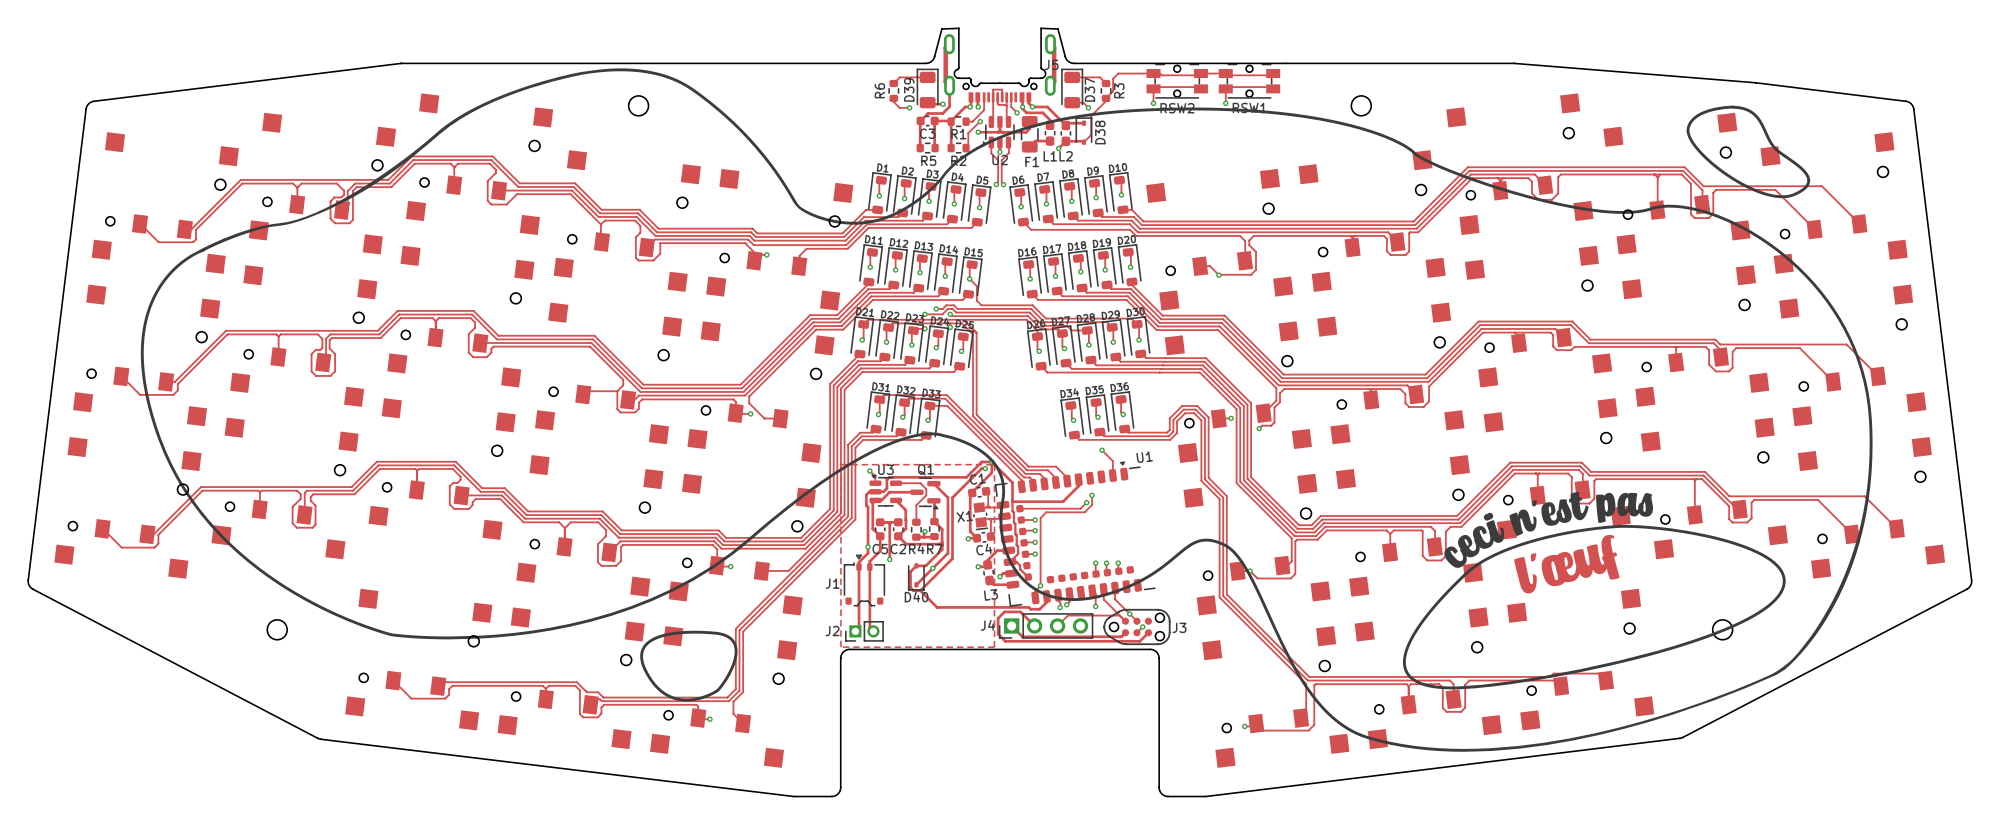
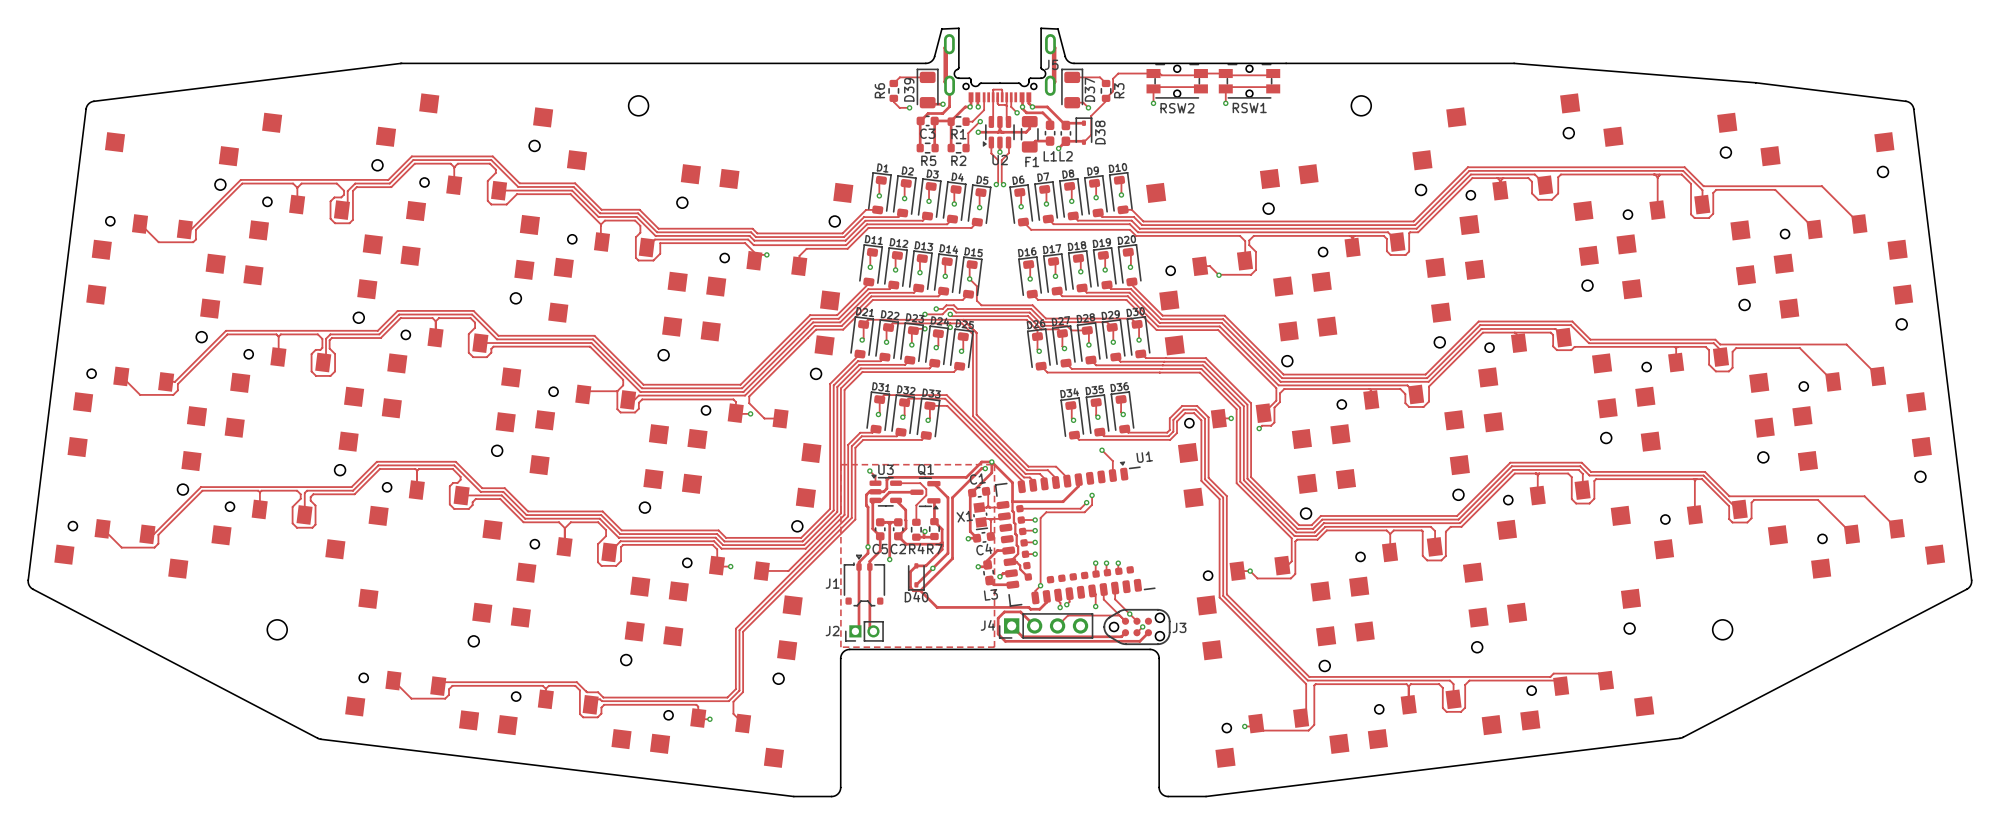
drawing: [140, 68, 1873, 752] -> none

